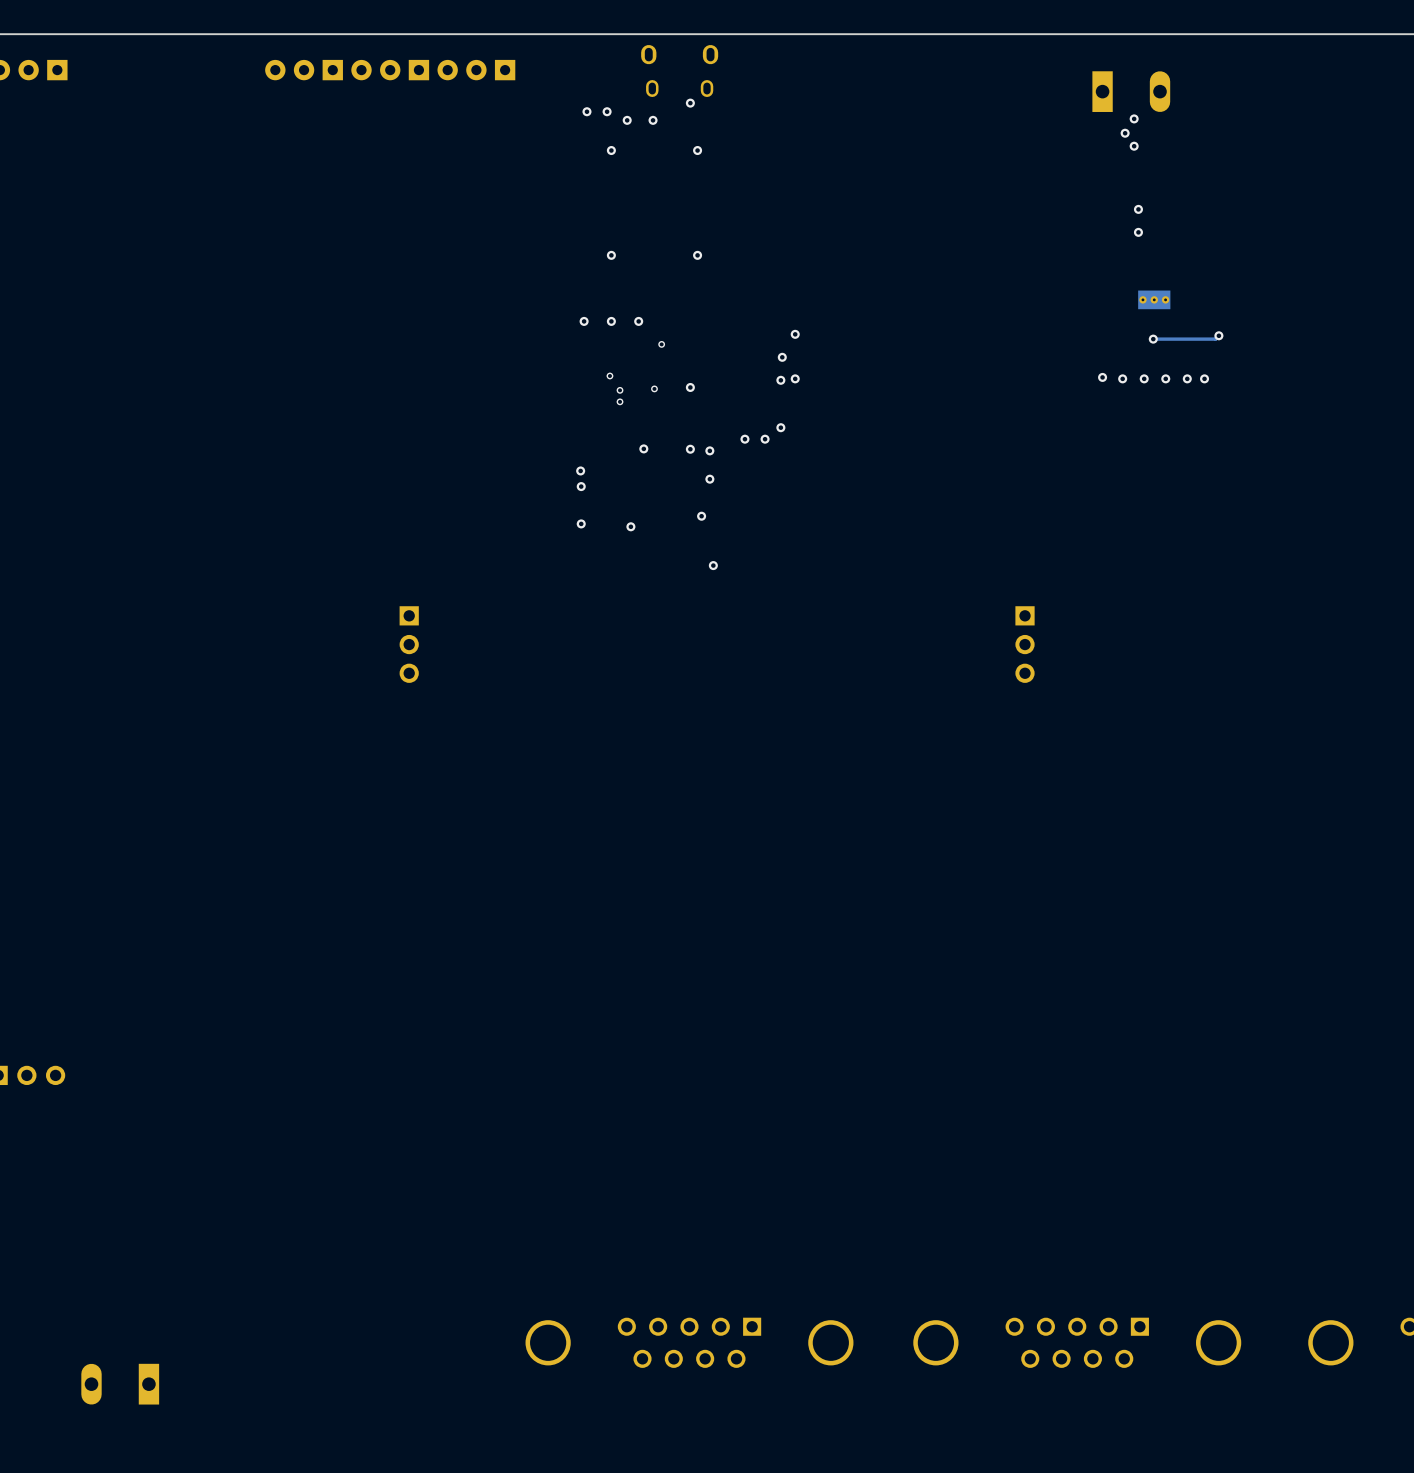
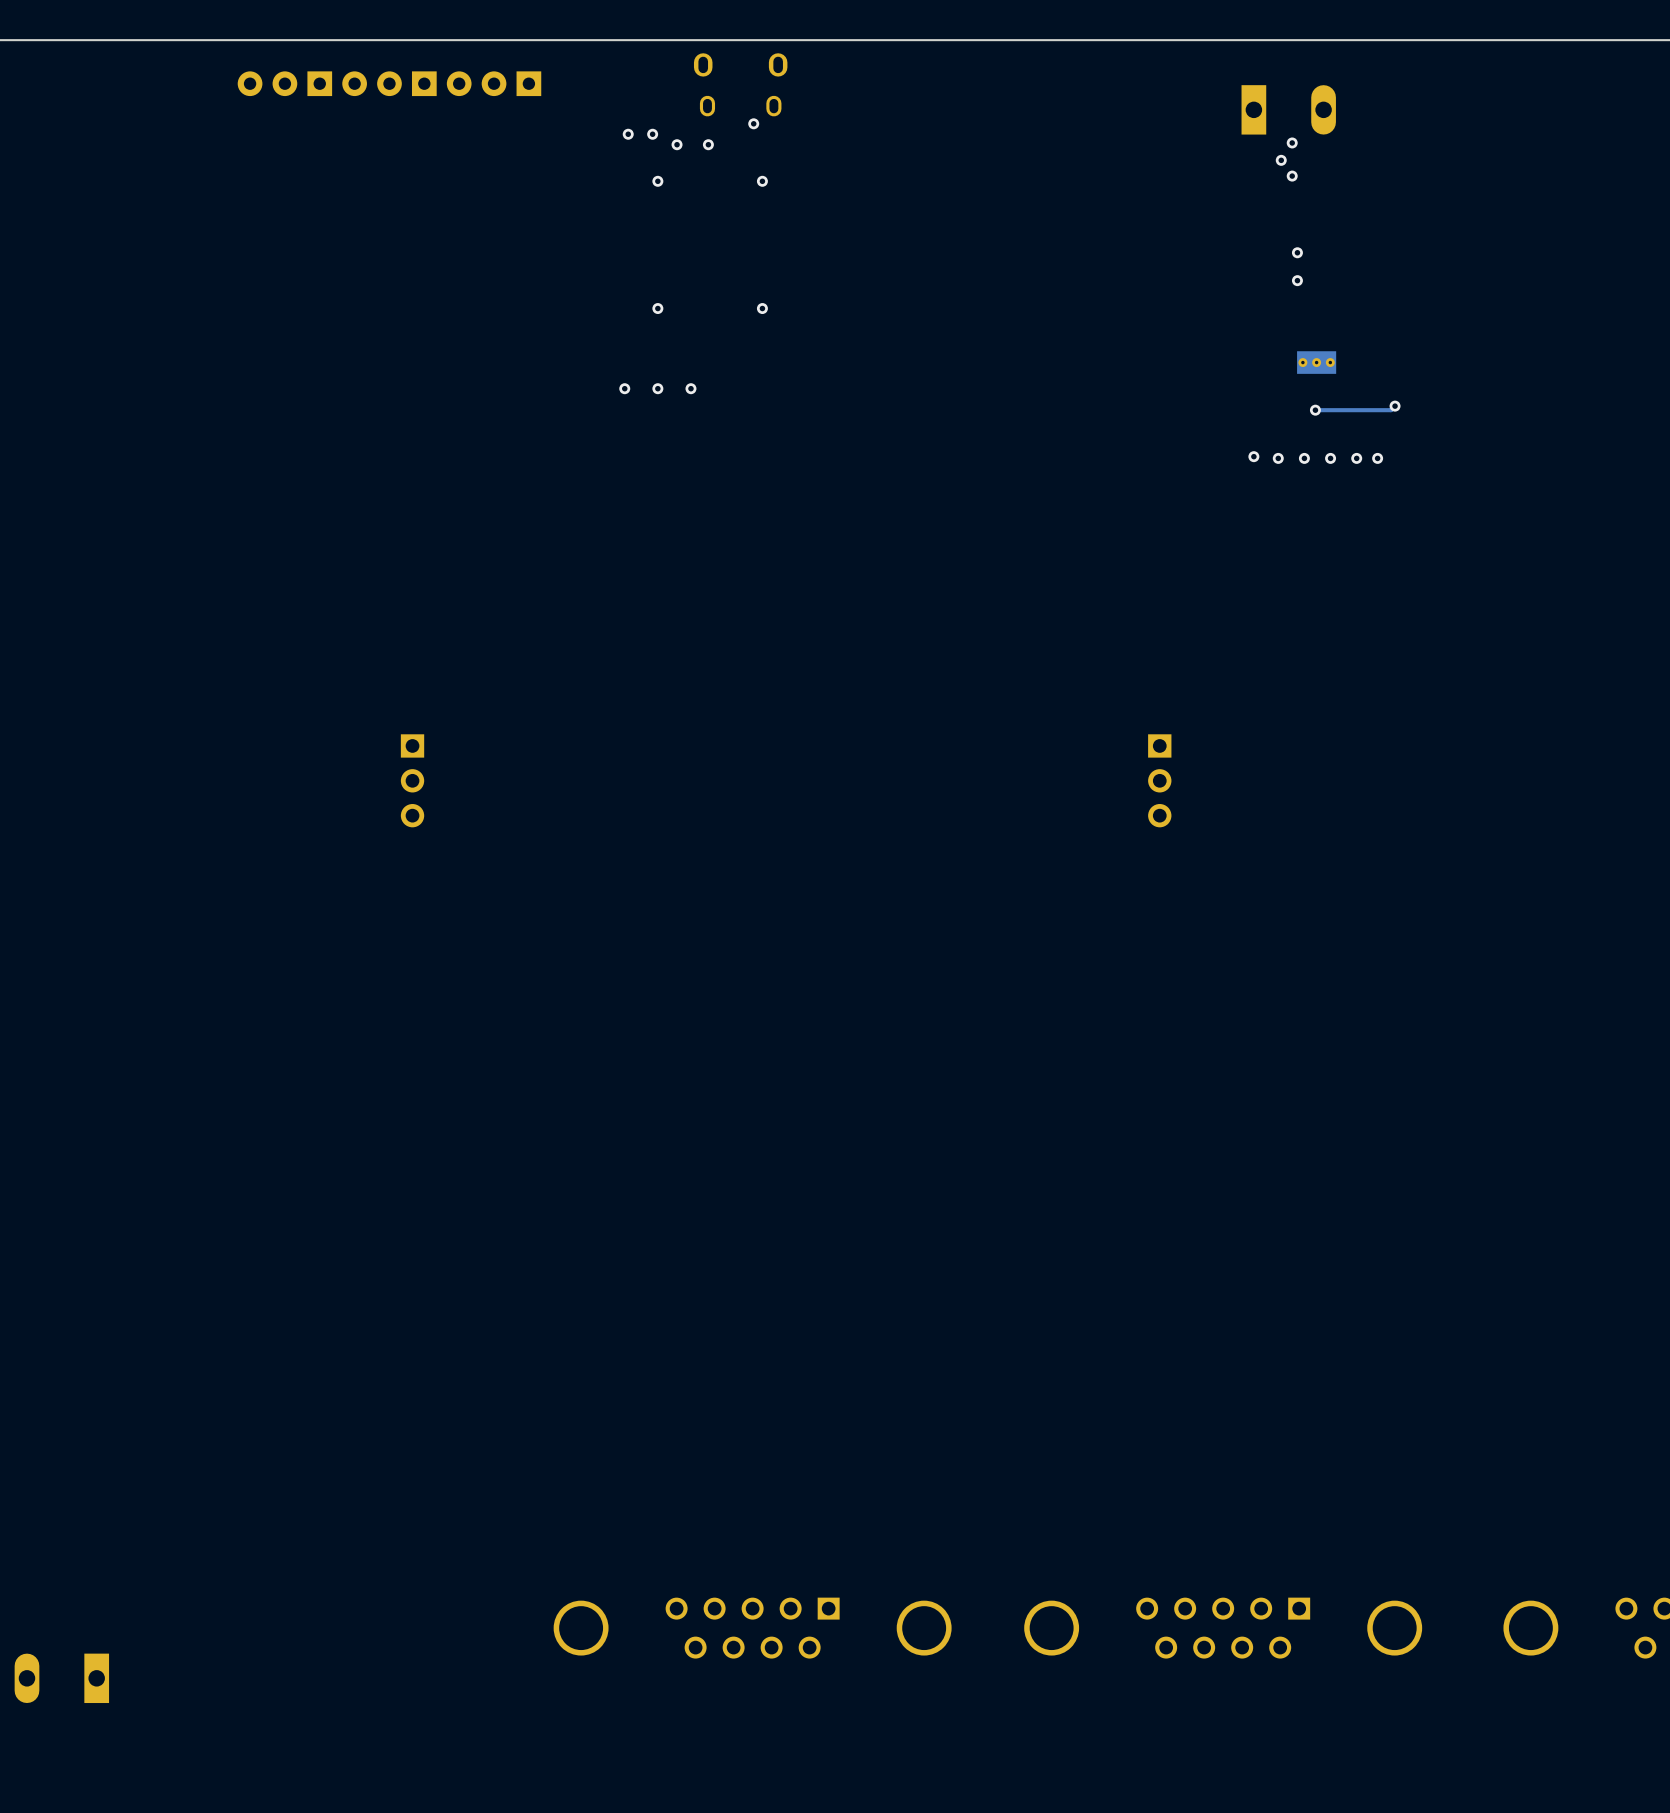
via: (795, 334) -> none
via: (661, 344) -> none
via: (782, 357) -> none
via: (609, 375) -> none
via: (795, 378) -> none
via: (780, 380) -> none
via: (690, 387) -> none
via: (654, 388) -> none
via: (620, 390) -> none
via: (620, 401) -> none
via: (780, 427) -> none
via: (744, 439) -> none
via: (765, 439) -> none
via: (643, 448) -> none
via: (690, 449) -> none
via: (709, 450) -> none
via: (580, 470) -> none
via: (709, 479) -> none
via: (581, 486) -> none
via: (701, 516) -> none
via: (581, 523) -> none
via: (630, 526) -> none
via: (713, 565) -> none

